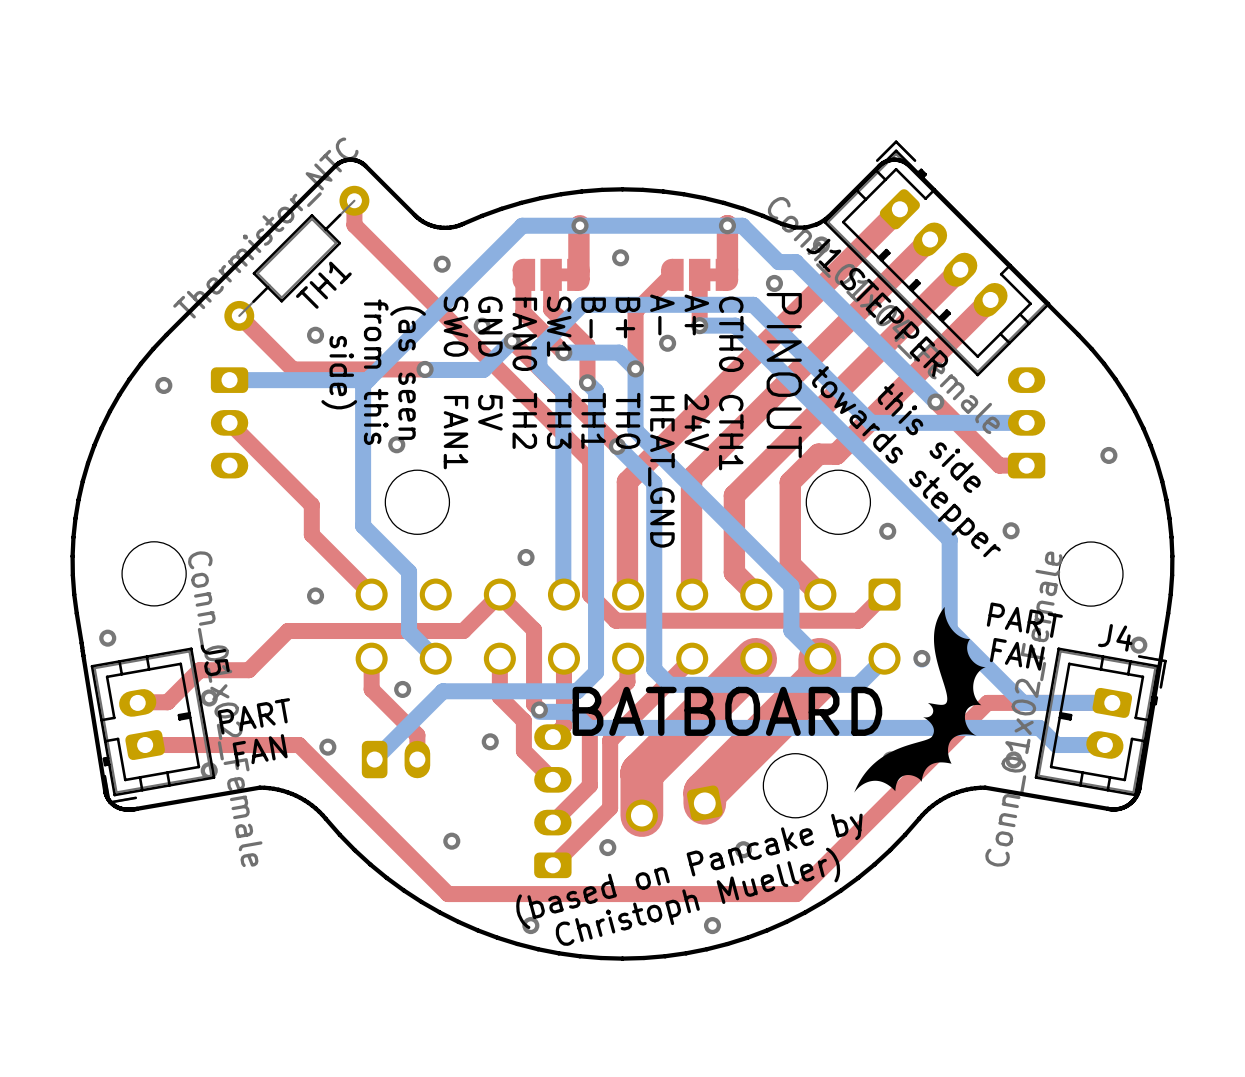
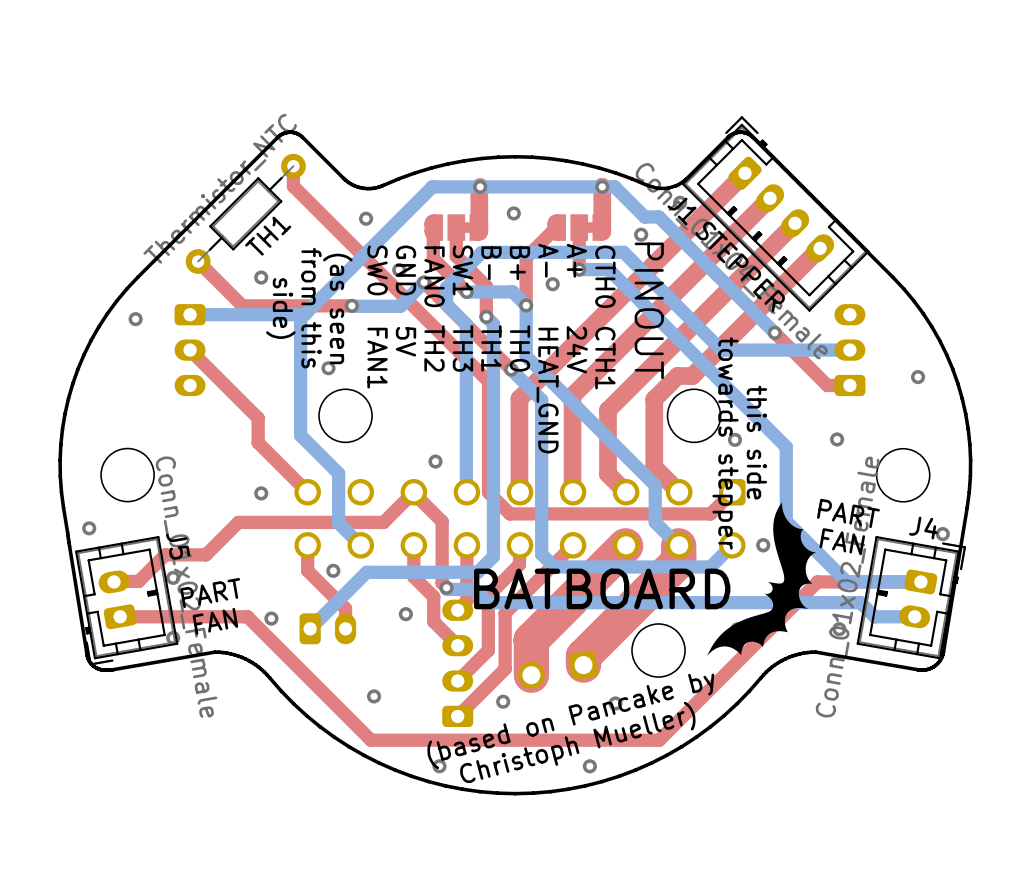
text rotation: 0° (929, 438) -> 45° clockwise (756, 442)
text rotation: 0° (906, 461) -> 45° clockwise (725, 443)

